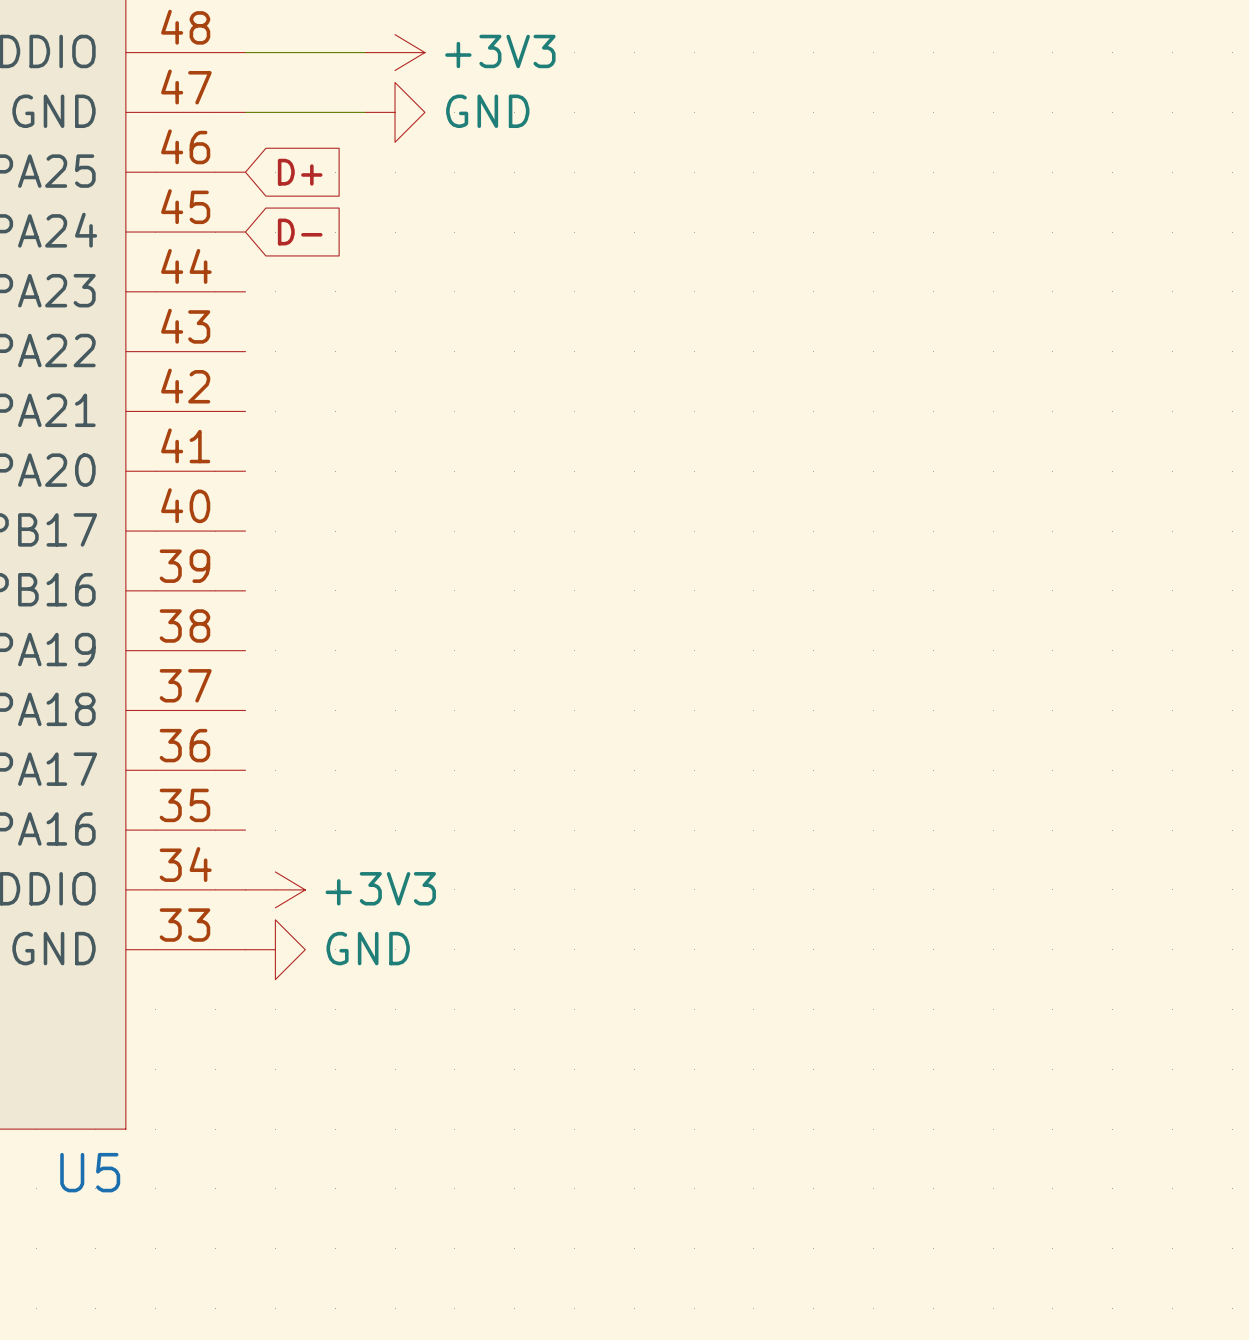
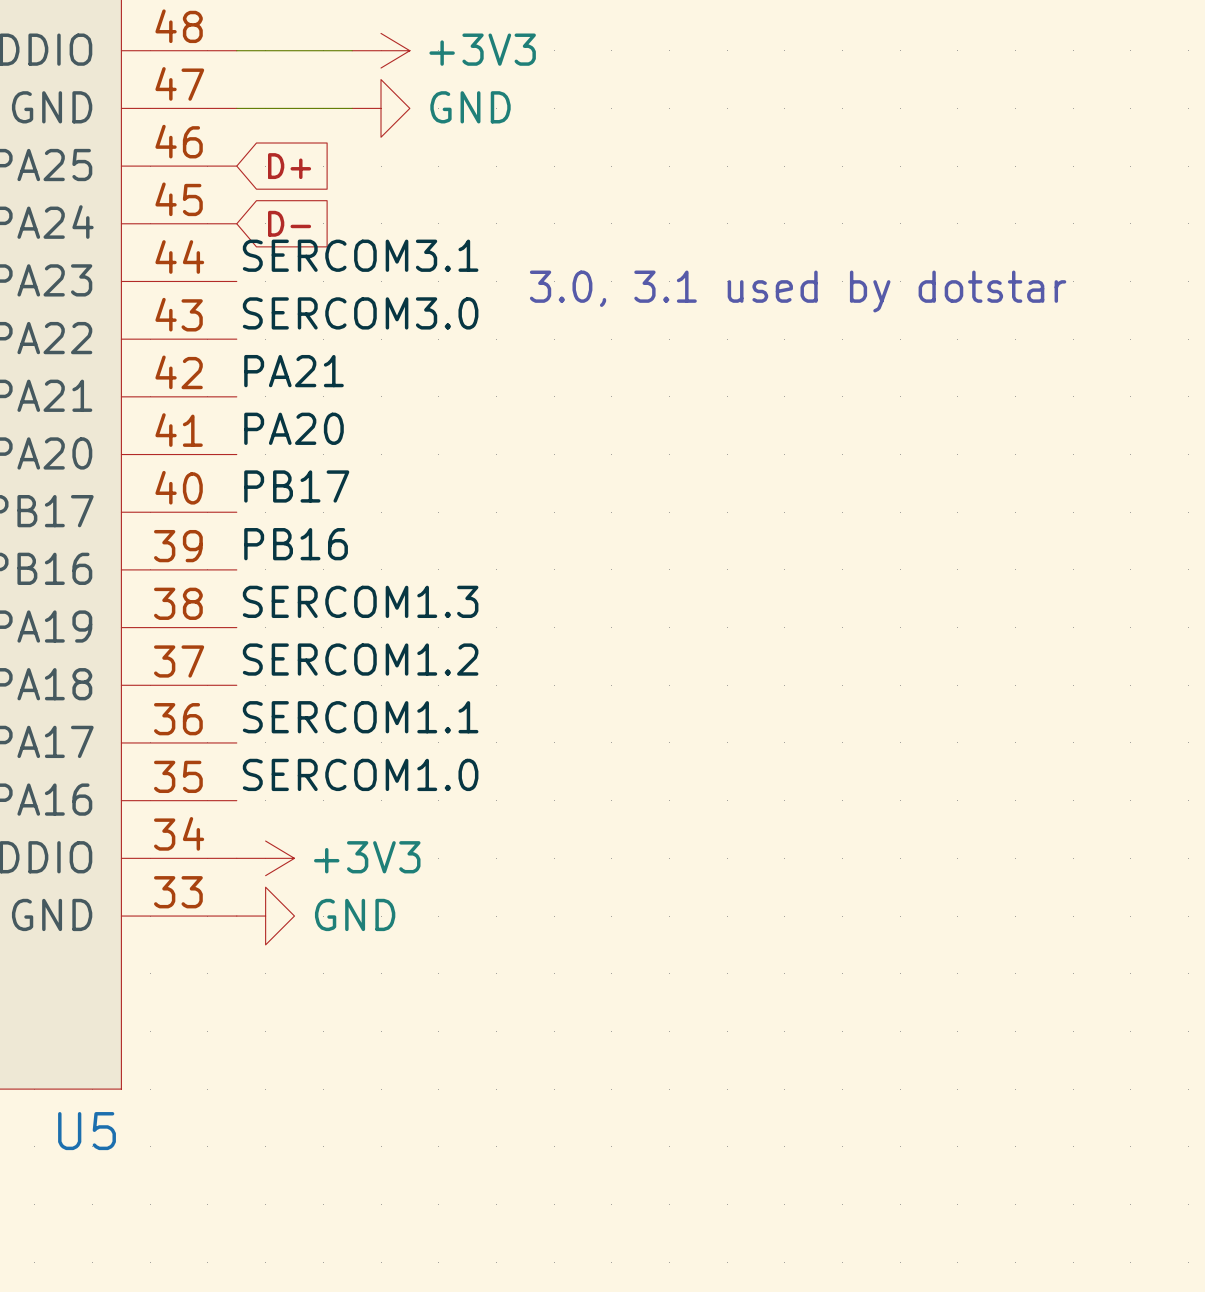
label: none -> SERCOM3.1 (360, 255)
text: none -> 3.0, 3.1 used by dotstar (798, 291)
label: none -> SERCOM3.0 (360, 313)
label: none -> PA21 (294, 371)
label: none -> PA20 (294, 428)
label: none -> PB17 (296, 486)
label: none -> PB16 (296, 544)
label: none -> SERCOM1.3 (360, 601)
label: none -> SERCOM1.2 (360, 659)
label: none -> SERCOM1.1 (360, 717)
label: none -> SERCOM1.0 (360, 774)

